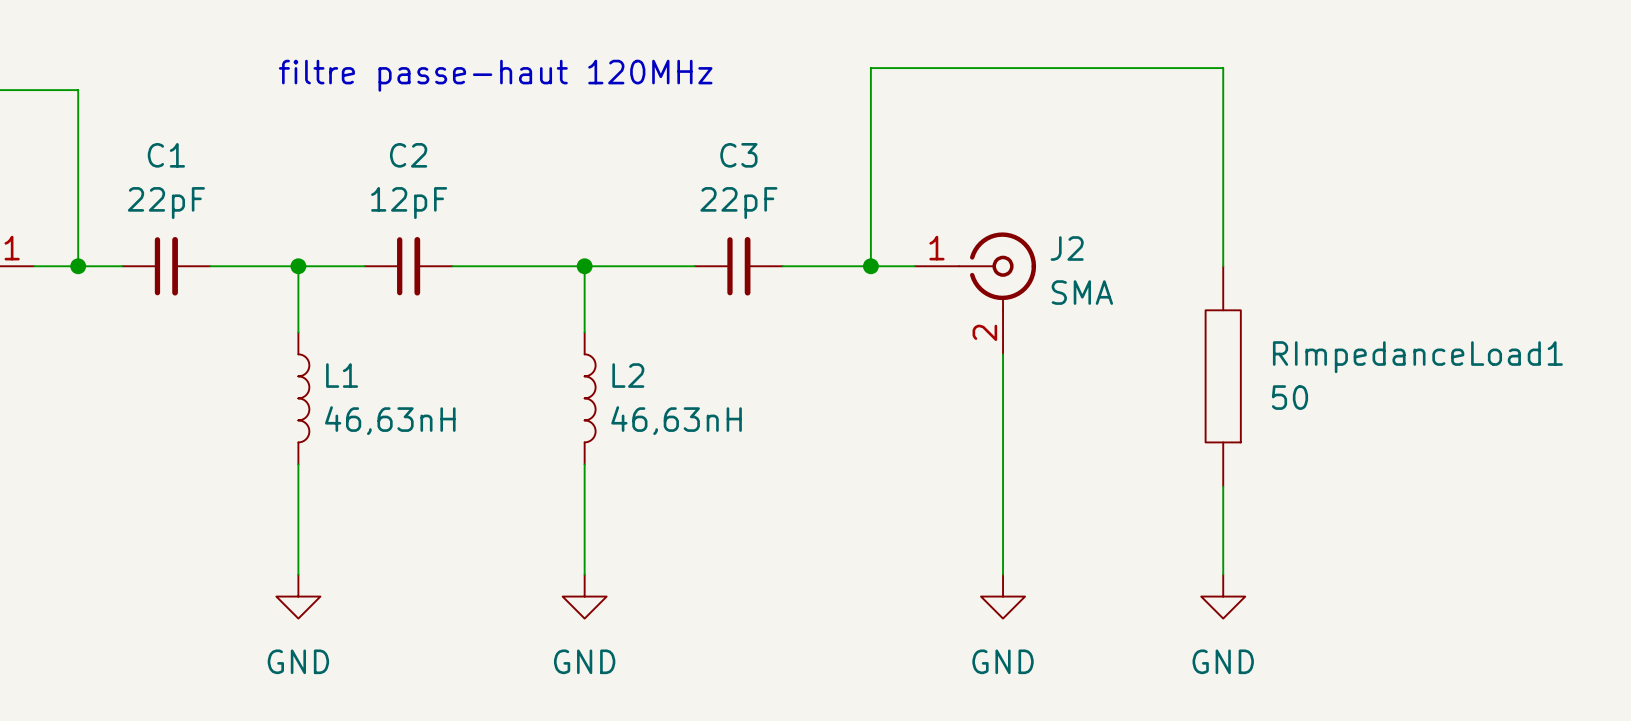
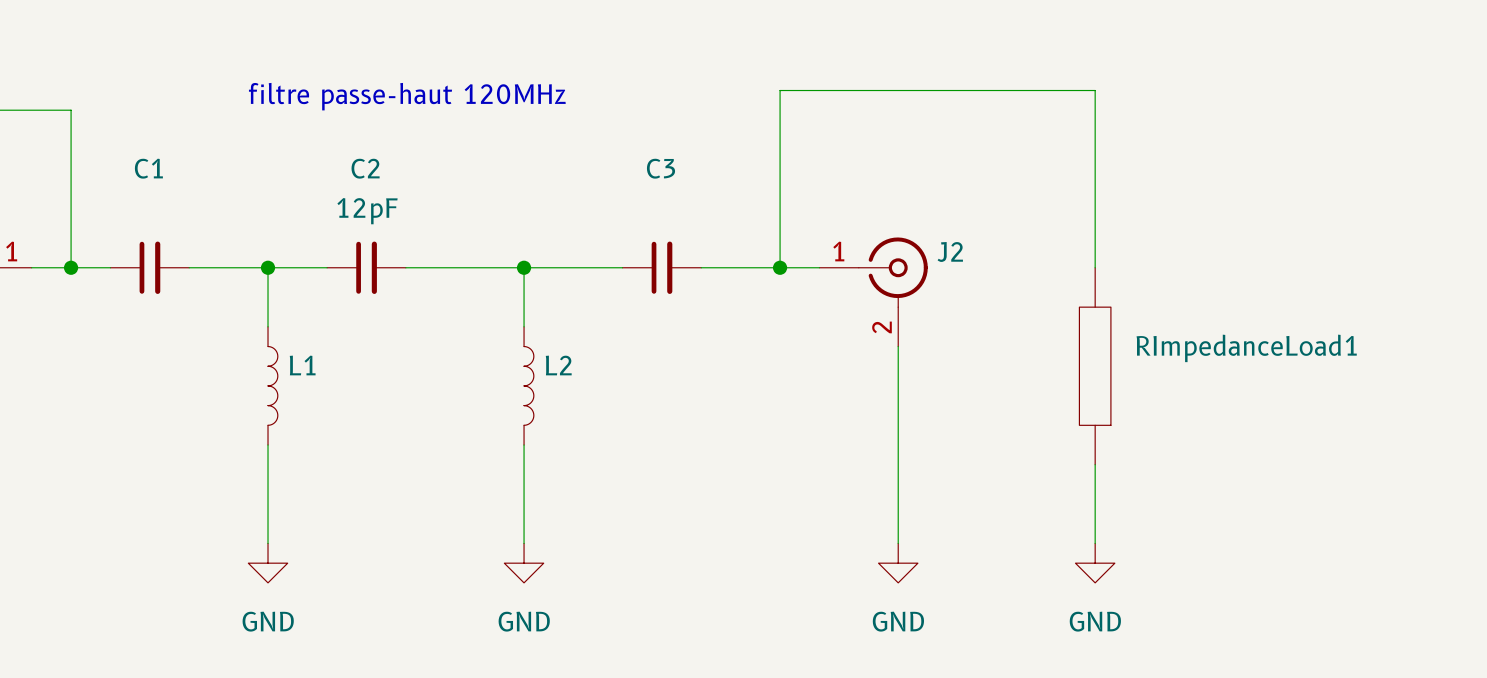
C1 value: 22pF (166, 203) -> none
C3 value: 22pF (738, 203) -> none
J2 value: SMA (1082, 292) -> none
RImpedanceLoad1 value: 50 (1289, 397) -> none
L1 value: 46,63nH (390, 420) -> none
L2 value: 46,63nH (676, 420) -> none

